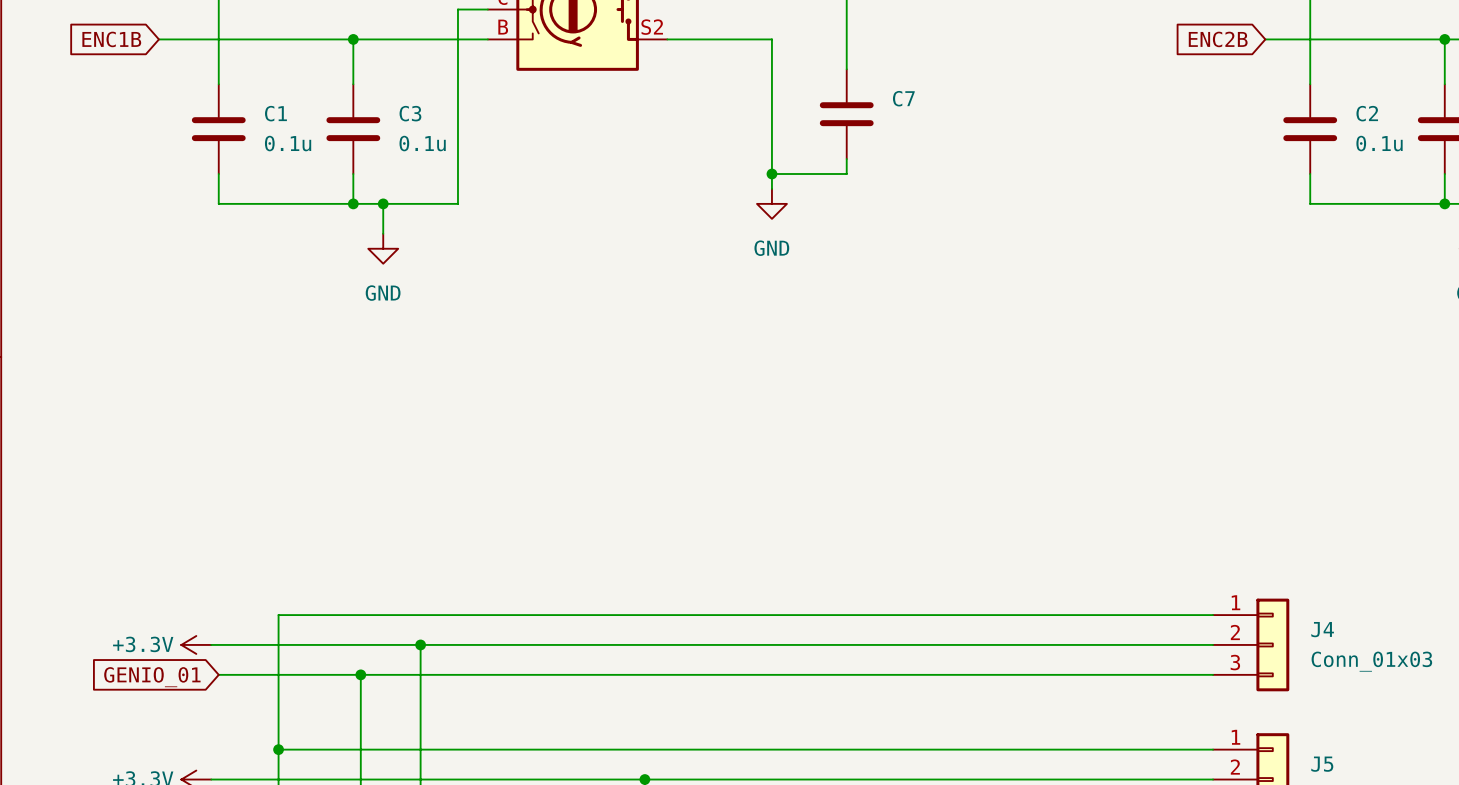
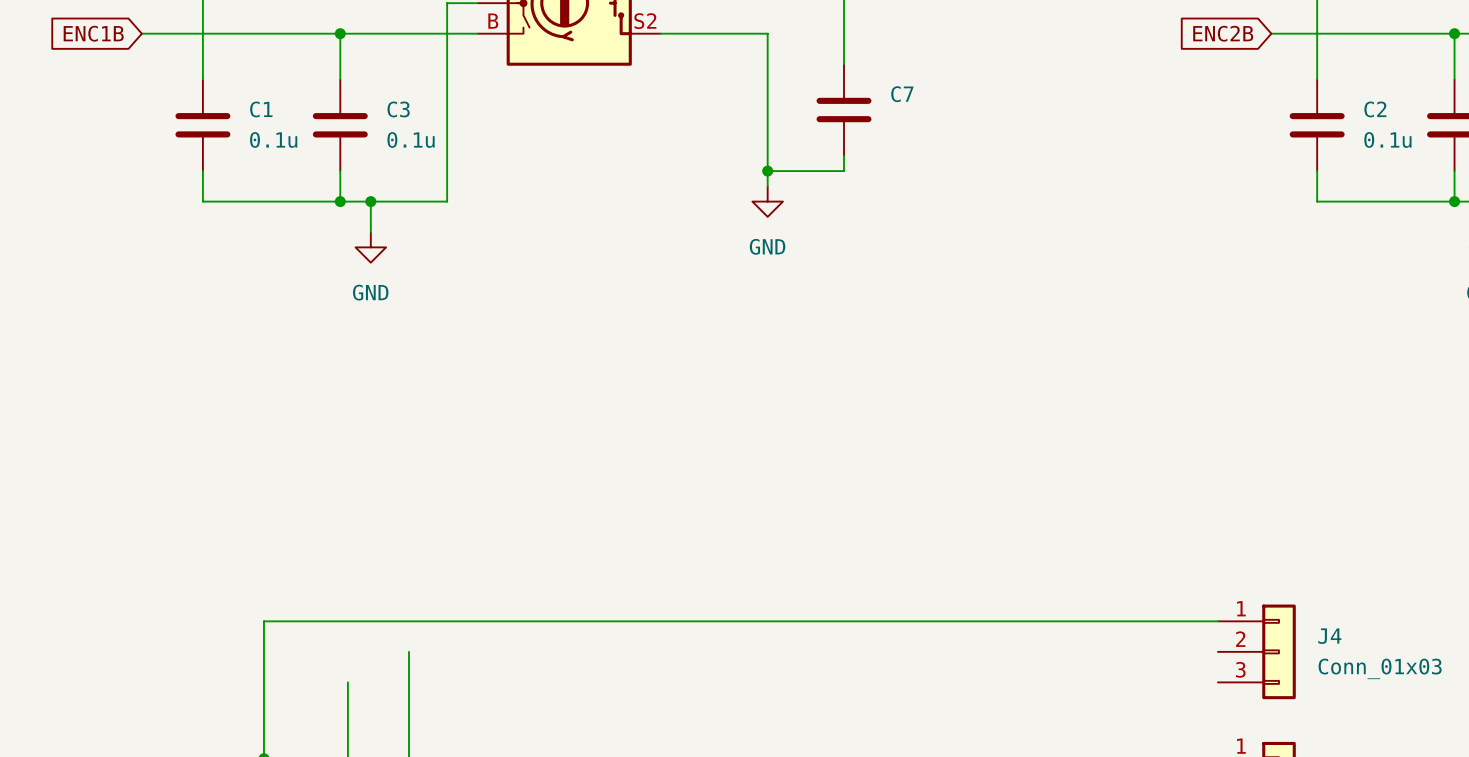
power symbol: +3.3V (196, 644) -> none
wire: (211, 644) (1213, 644) -> none
junction: (420, 644) -> none
wire: (218, 674) (1213, 674) -> none
junction: (360, 674) -> none
global label: GENIO_01 (152, 677) -> none

